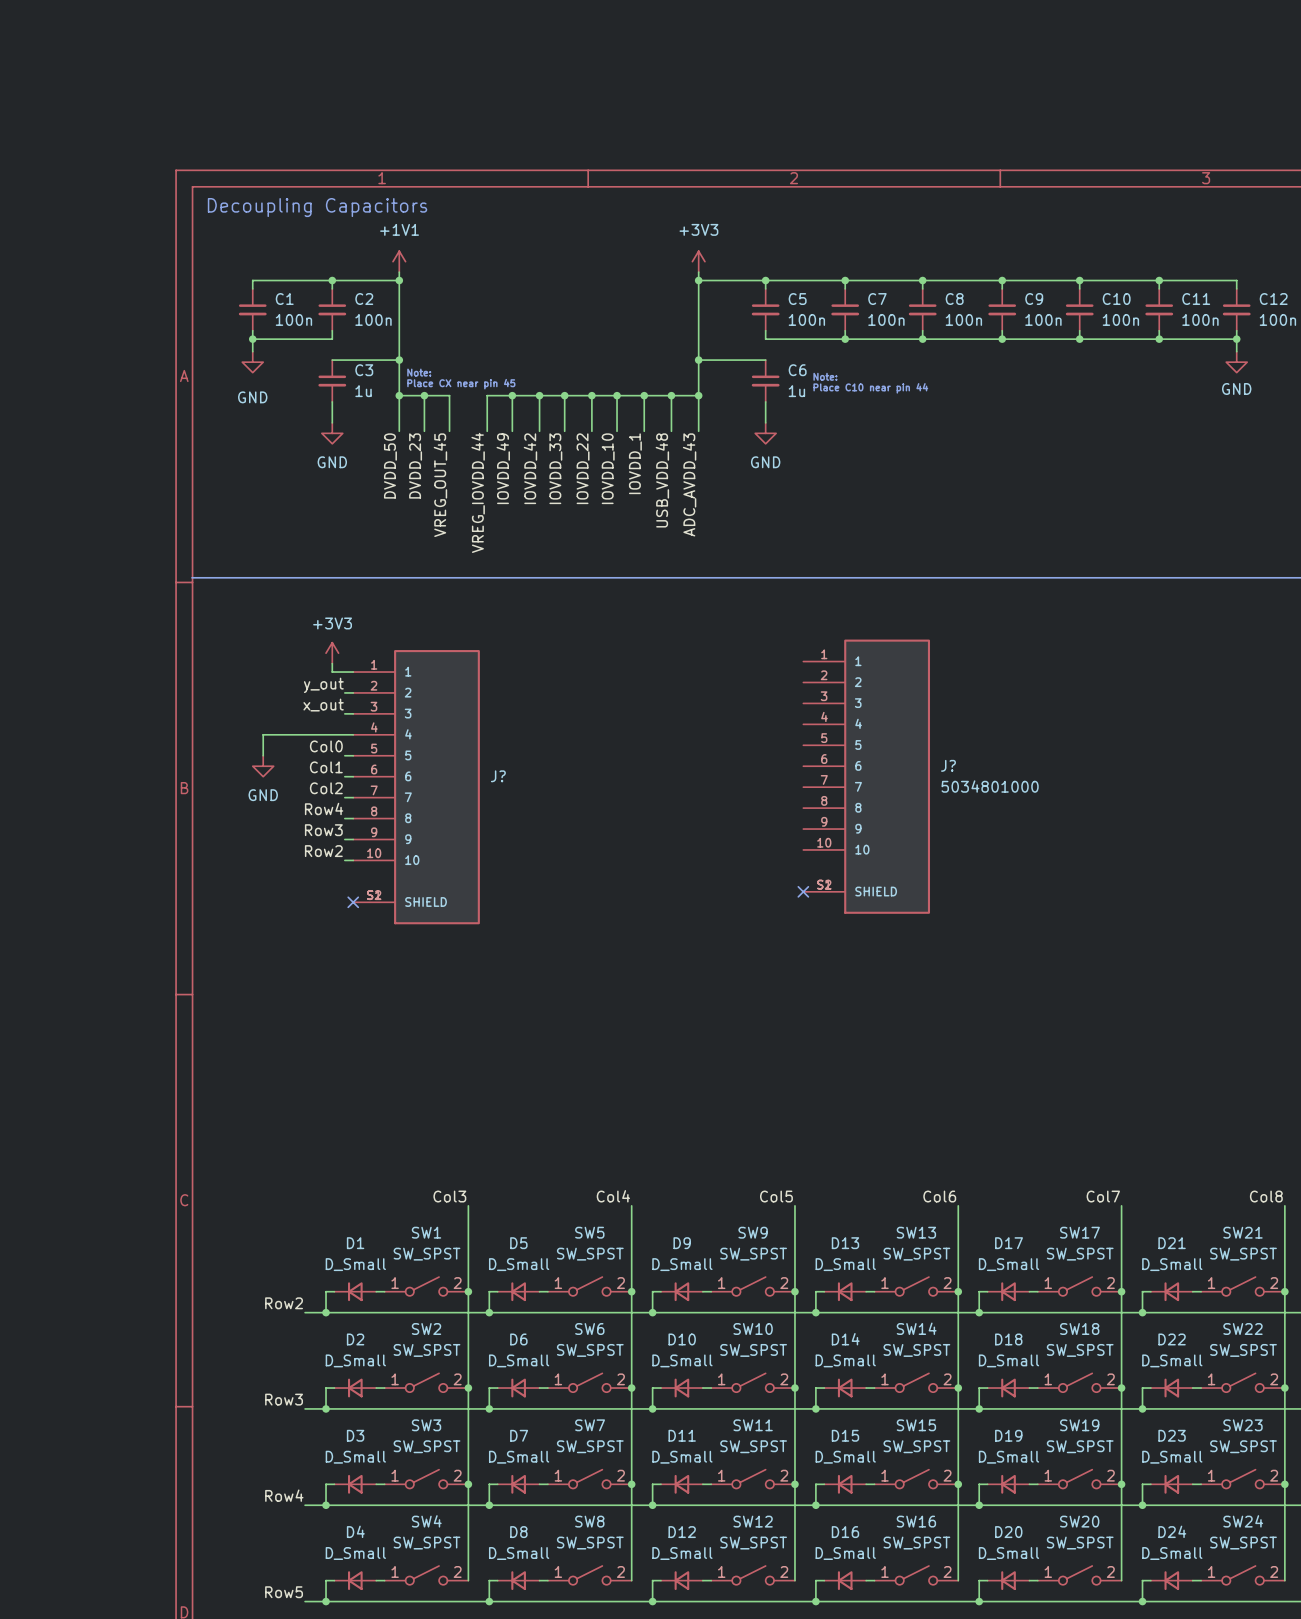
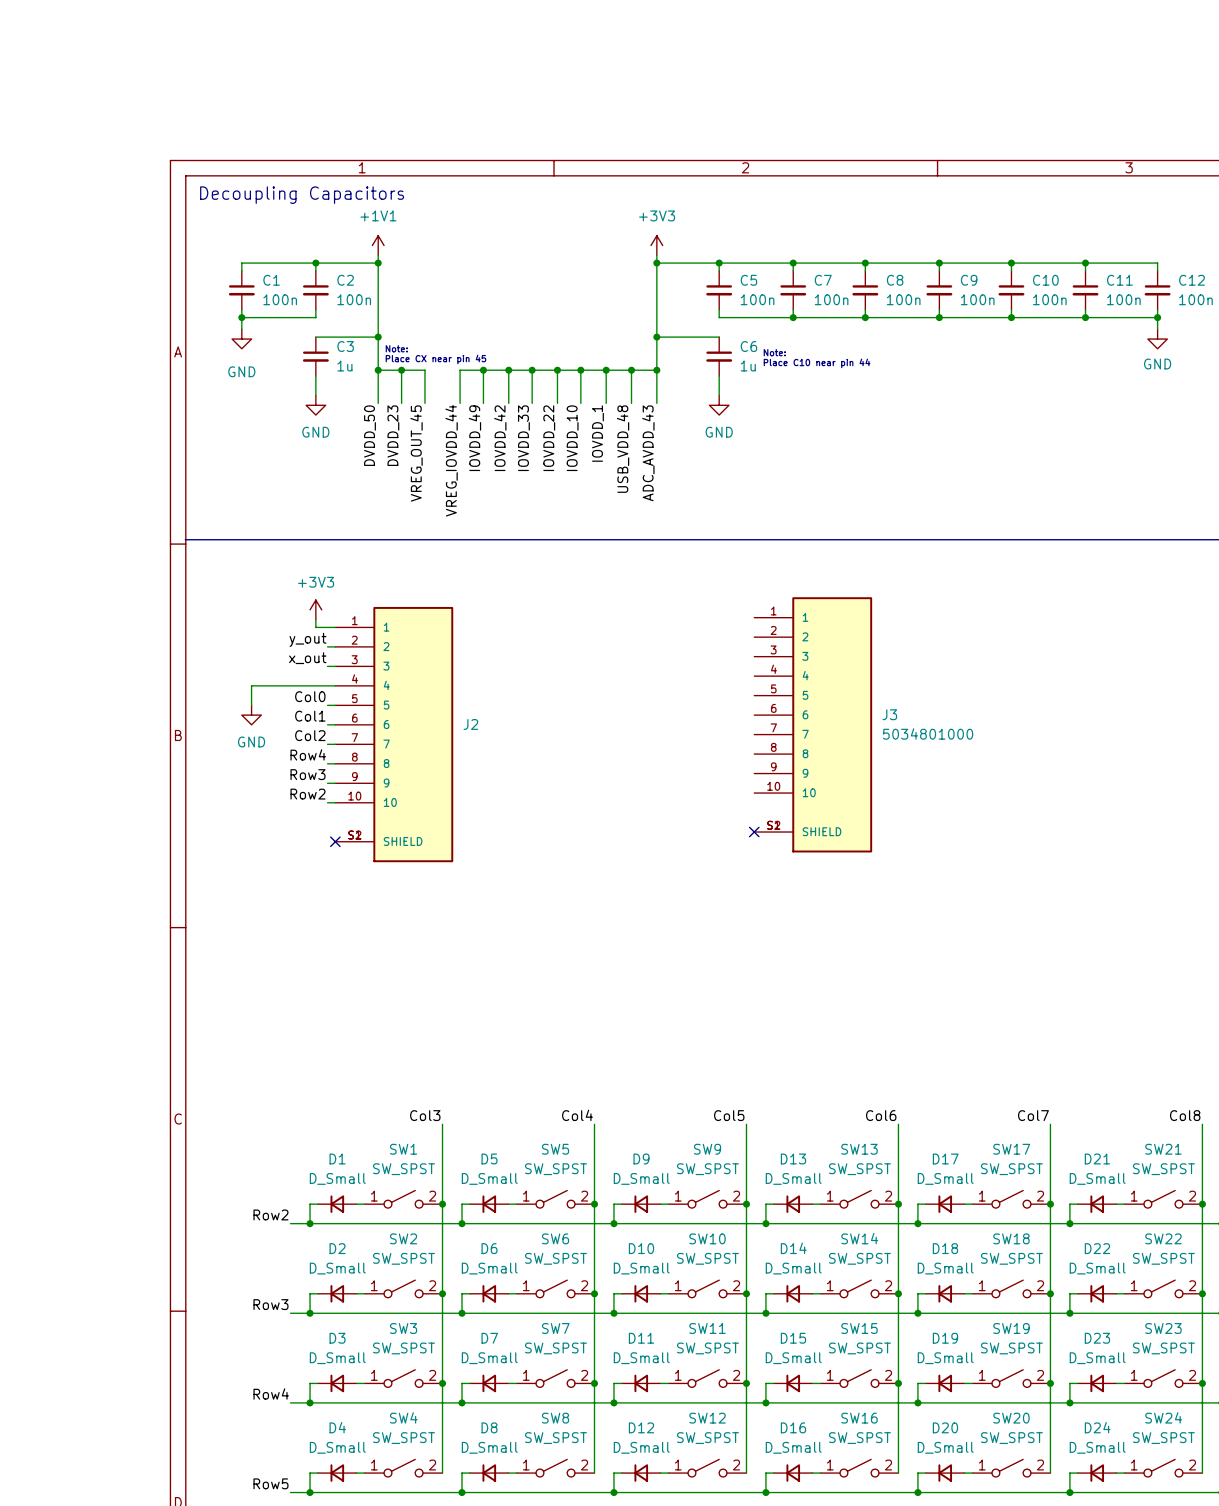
J? name: J? (948, 765) -> J3 (889, 714)
J? name: J? (498, 776) -> J2 (470, 724)

